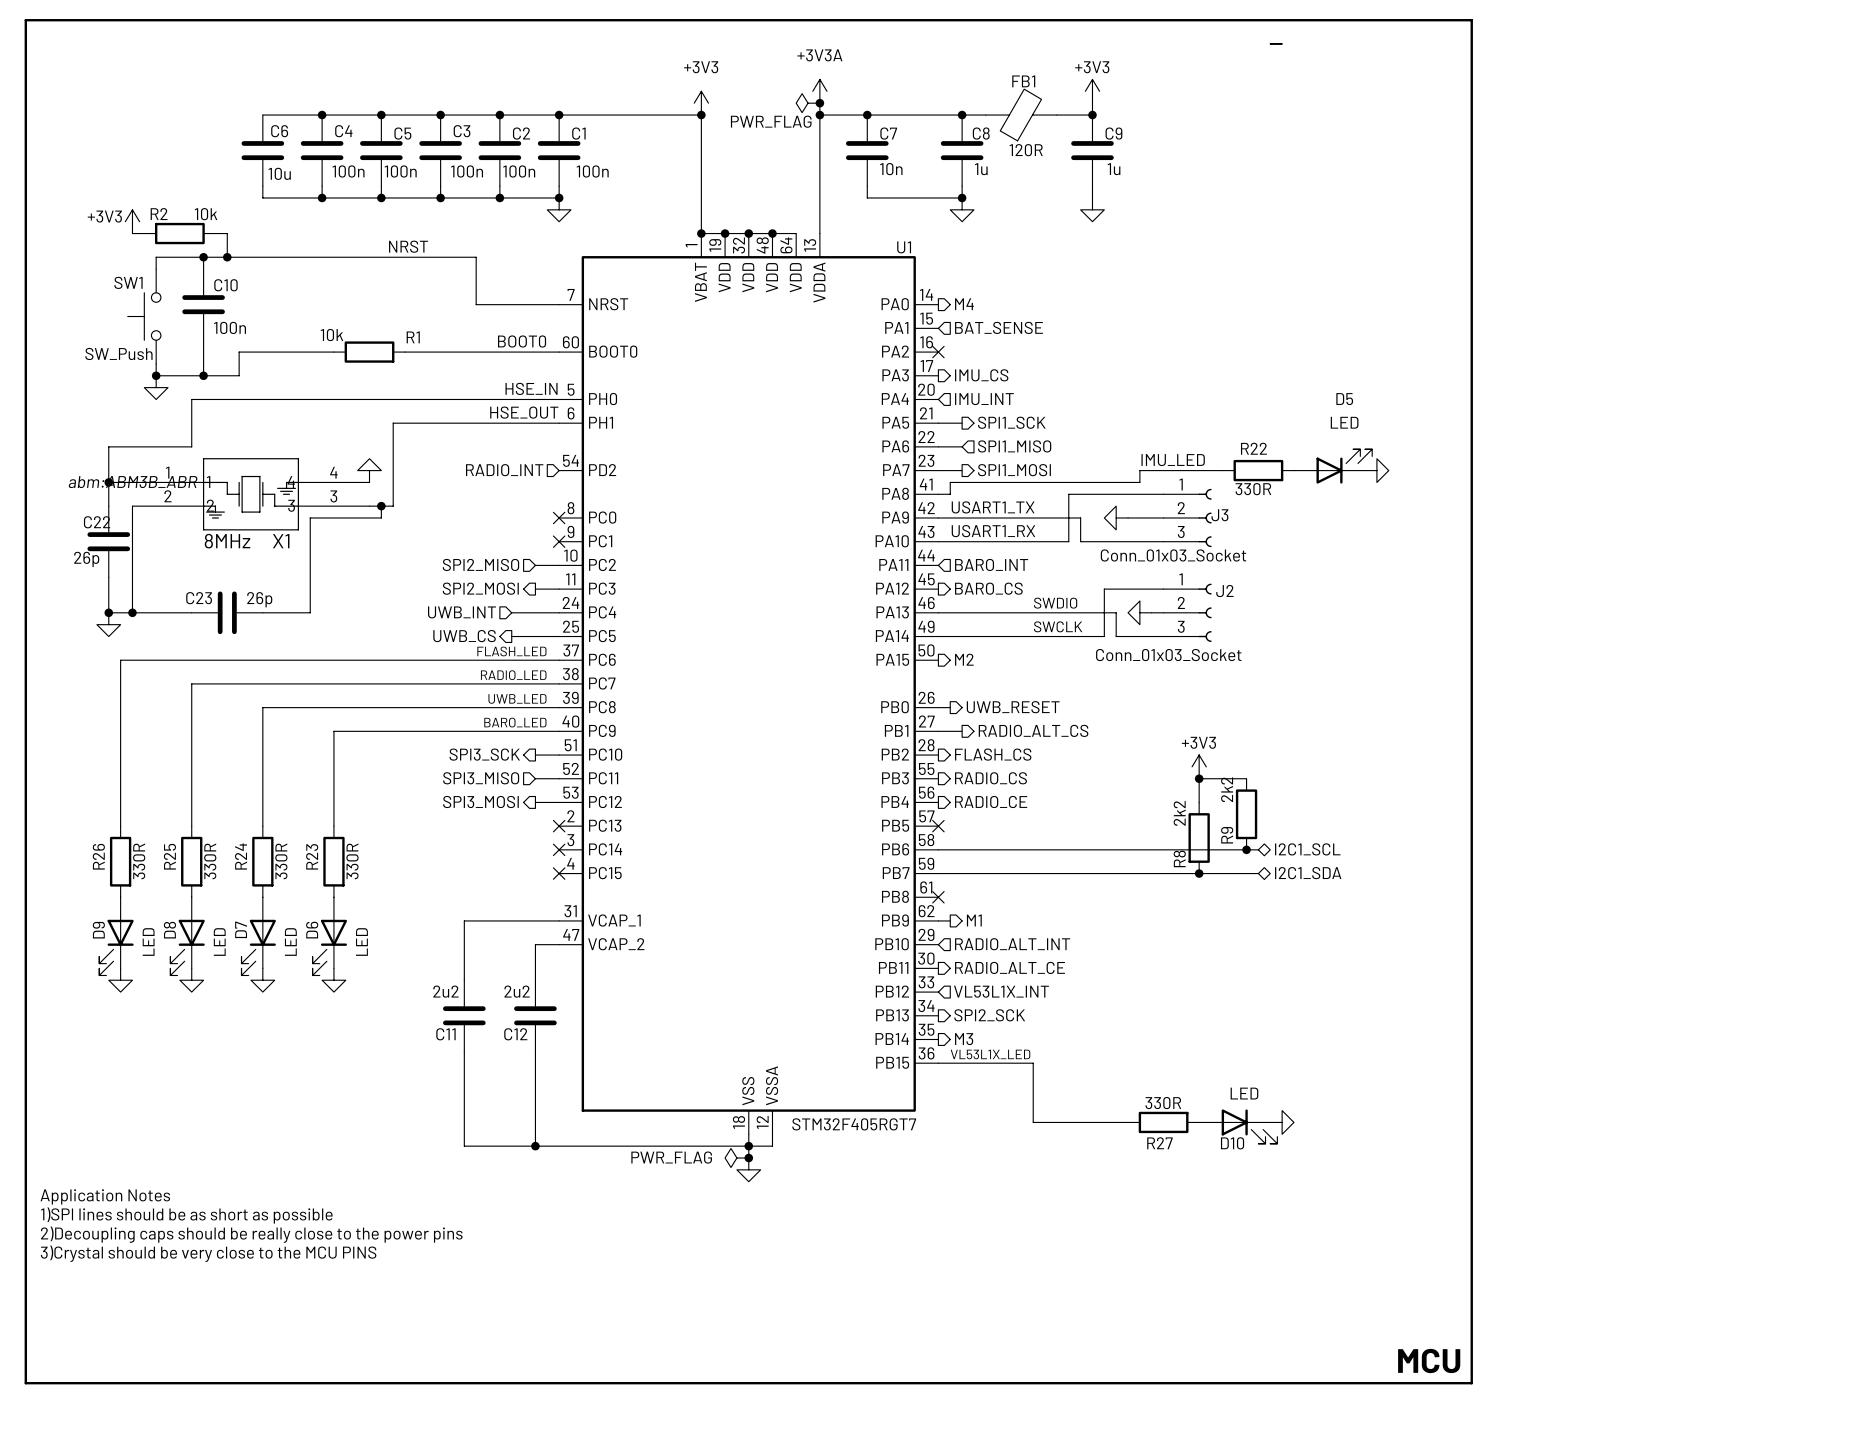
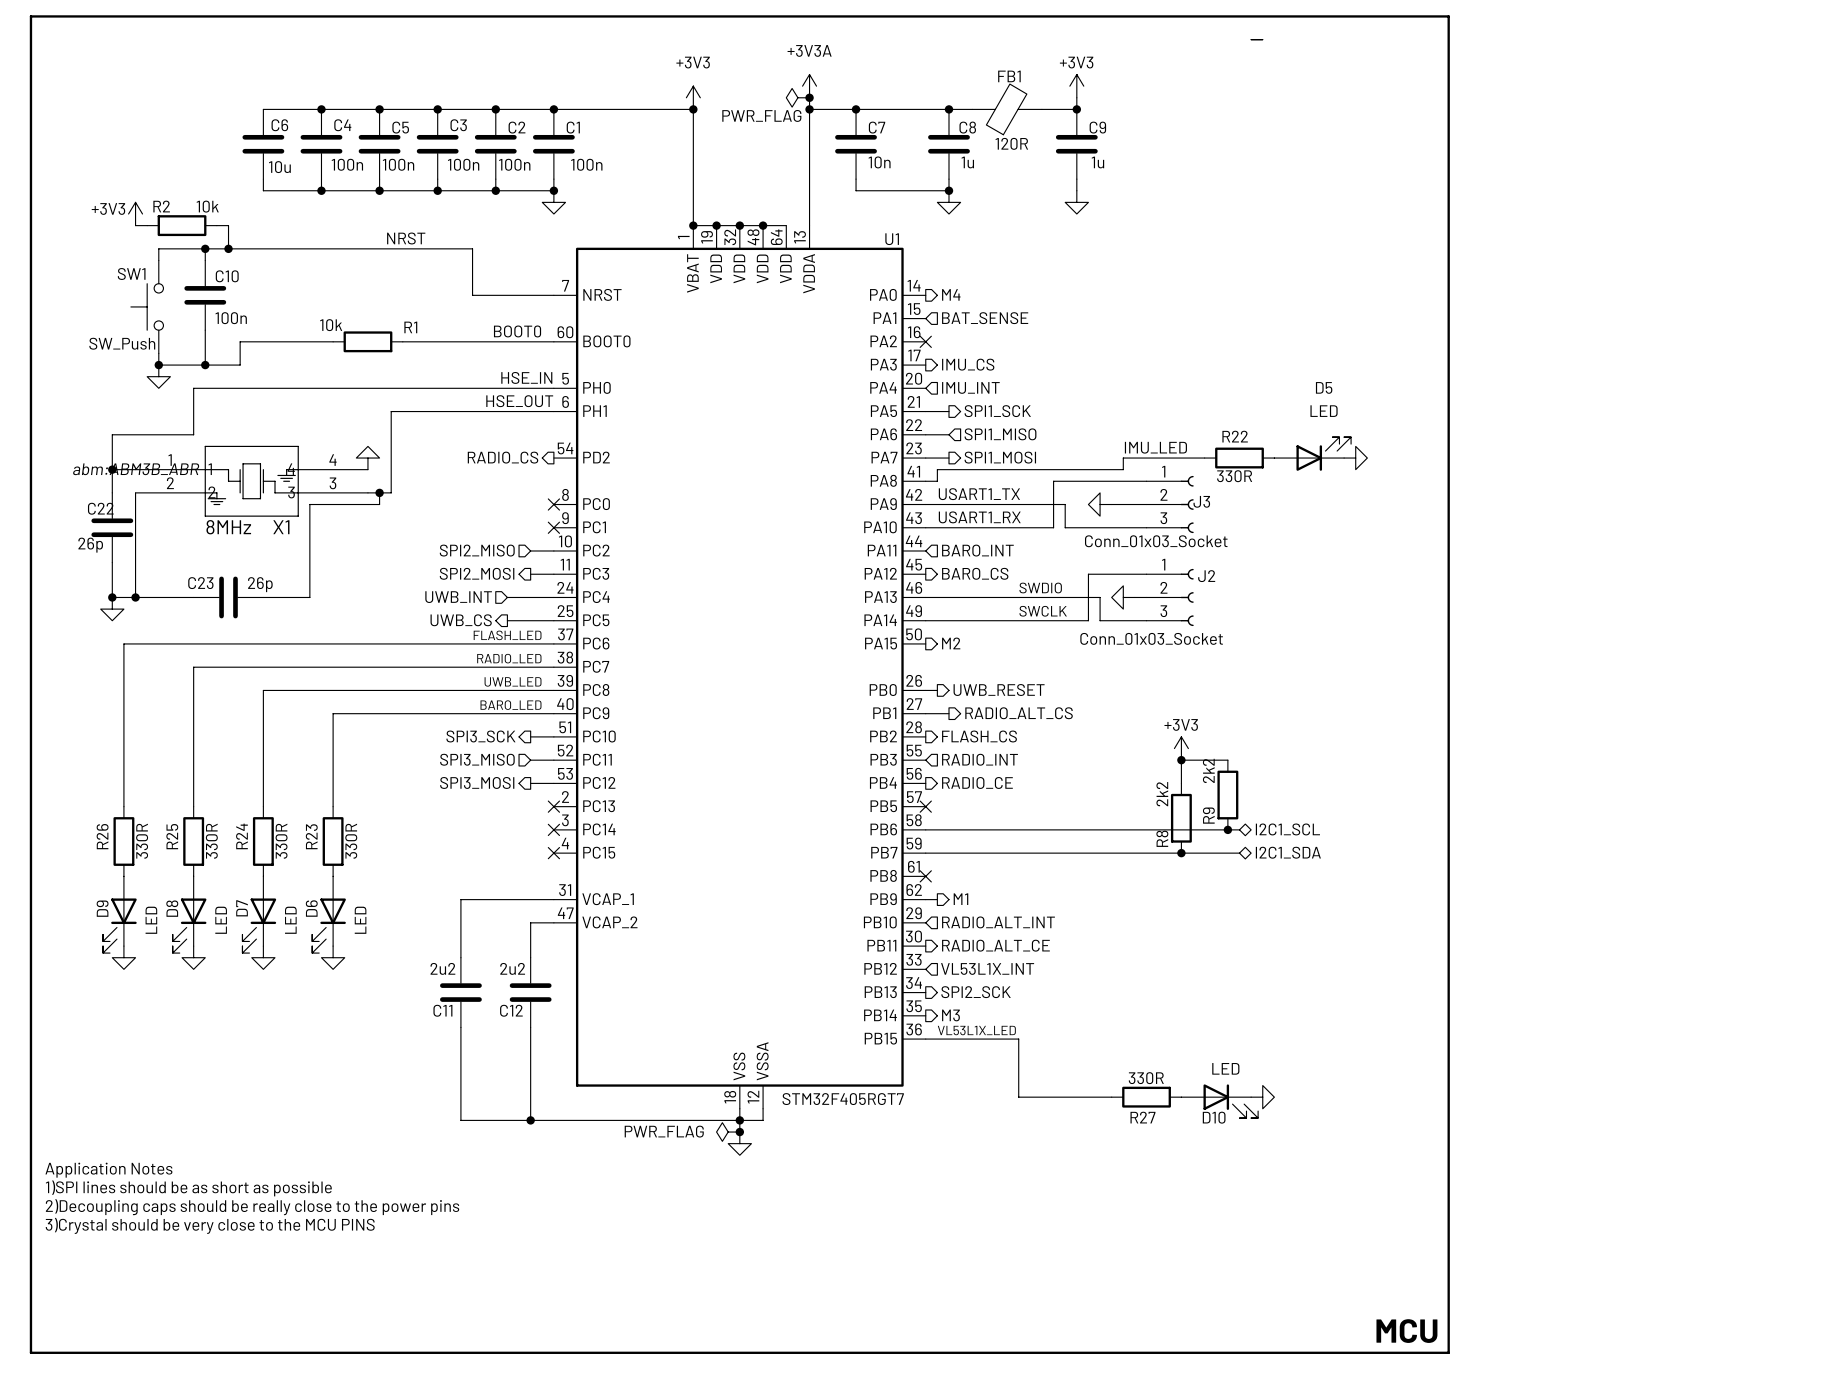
hierarchical label shape: input (504, 470) -> output (503, 457)
hierarchical label: RADIO_INT (504, 470) -> RADIO_CS (503, 457)
hierarchical label shape: output (990, 778) -> input (980, 759)
hierarchical label: RADIO_CS (990, 778) -> RADIO_INT (980, 759)

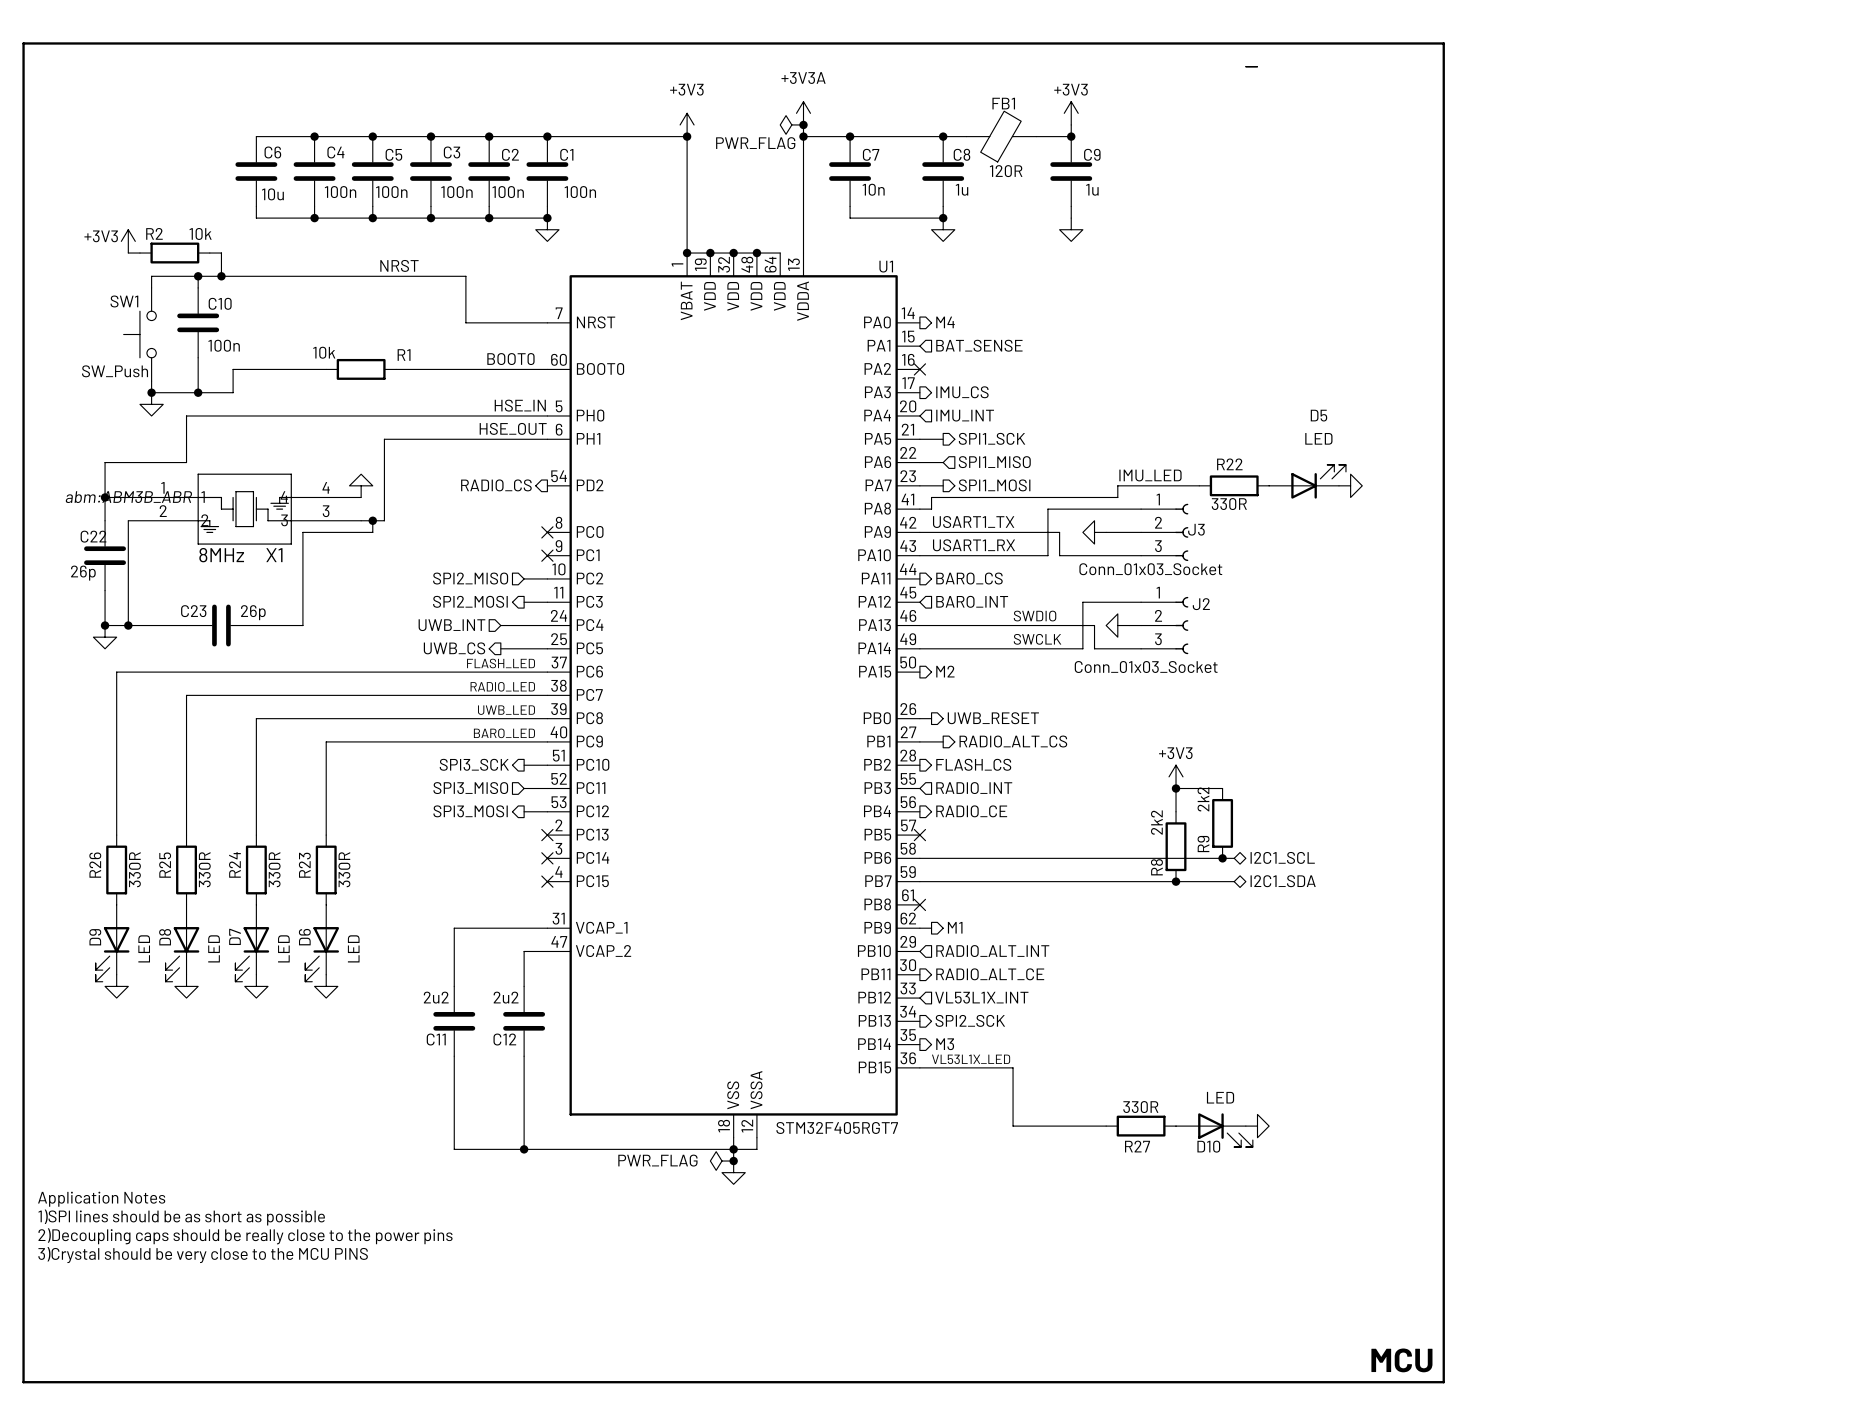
hierarchical label shape: input (977, 550) -> output (969, 578)
hierarchical label: BARO_INT (977, 550) -> BARO_CS (969, 578)
hierarchical label shape: output (975, 573) -> input (972, 601)
hierarchical label: BARO_CS (975, 573) -> BARO_INT (972, 601)

